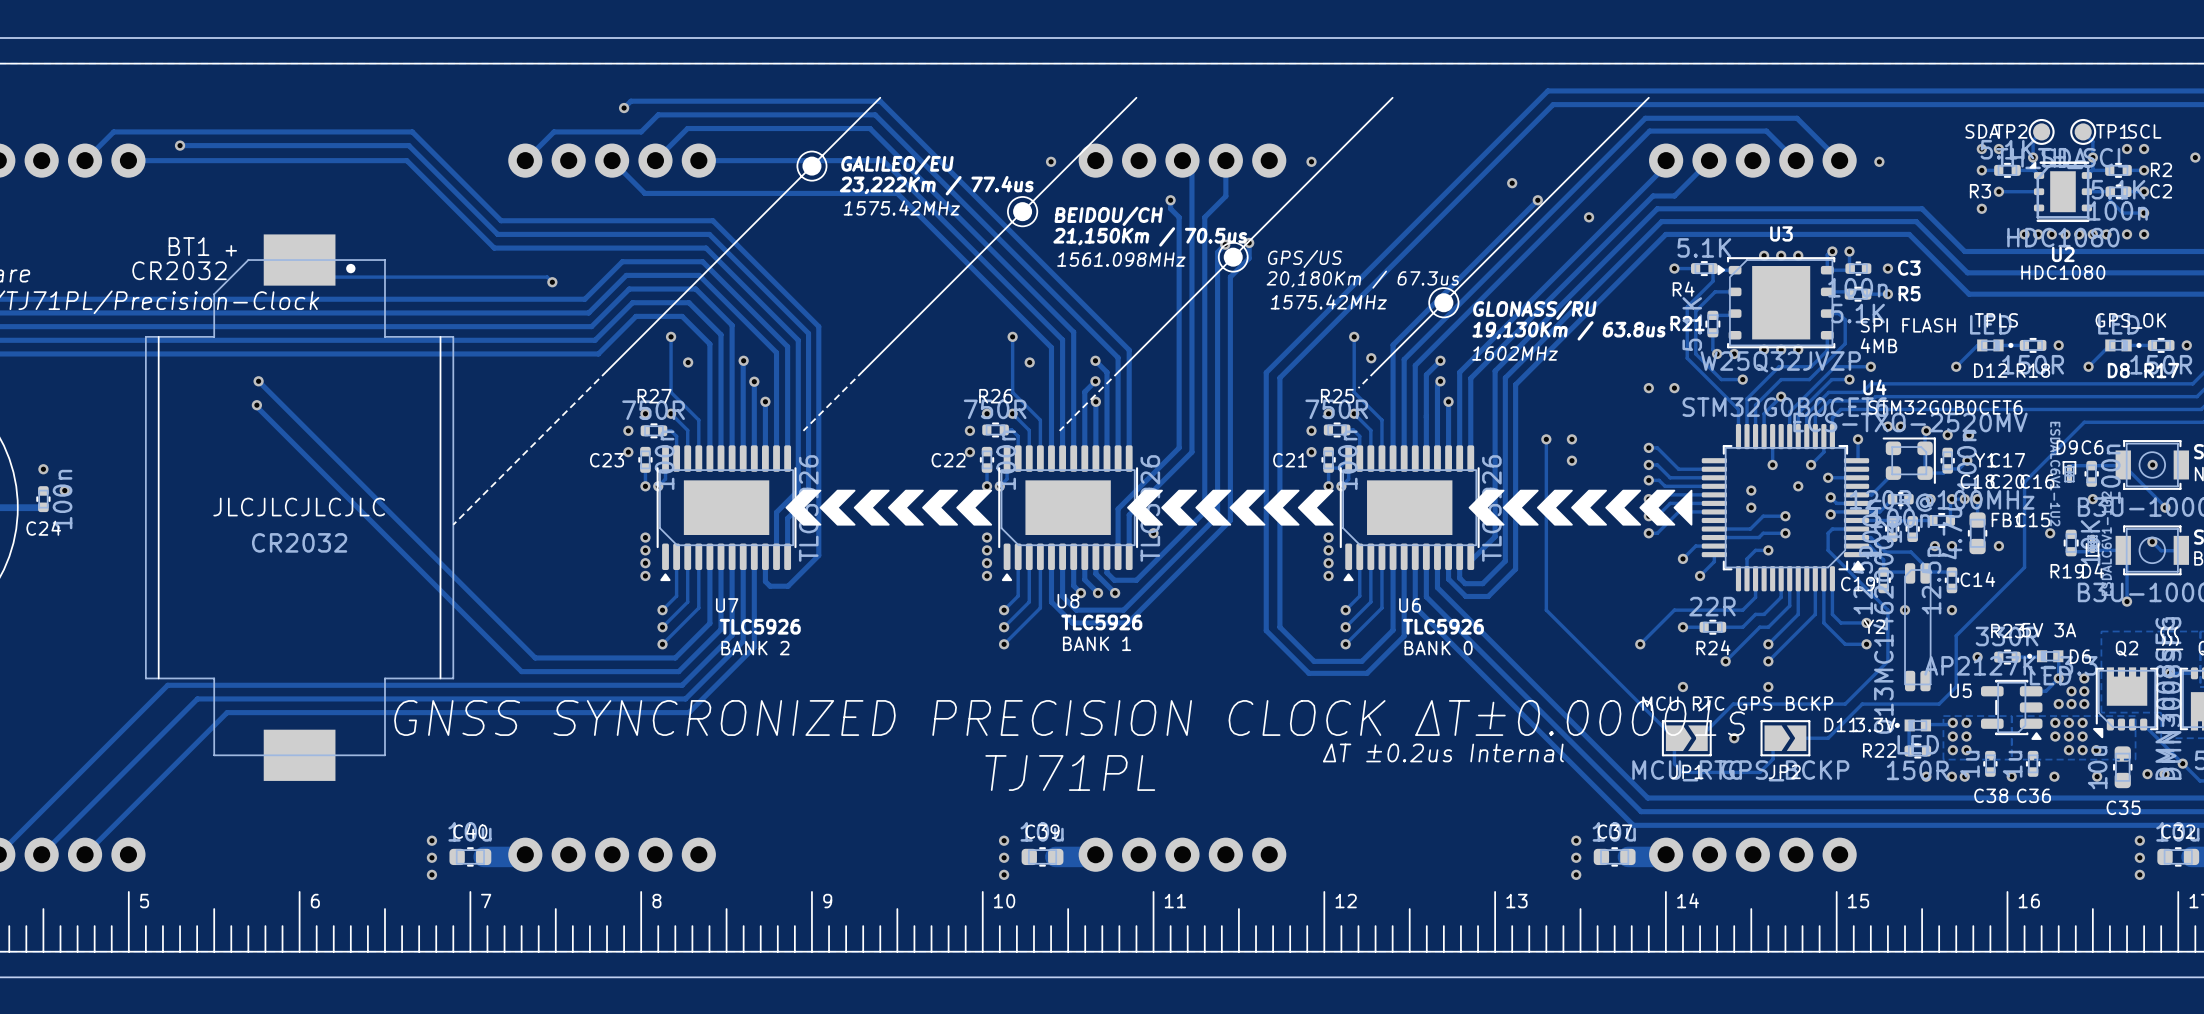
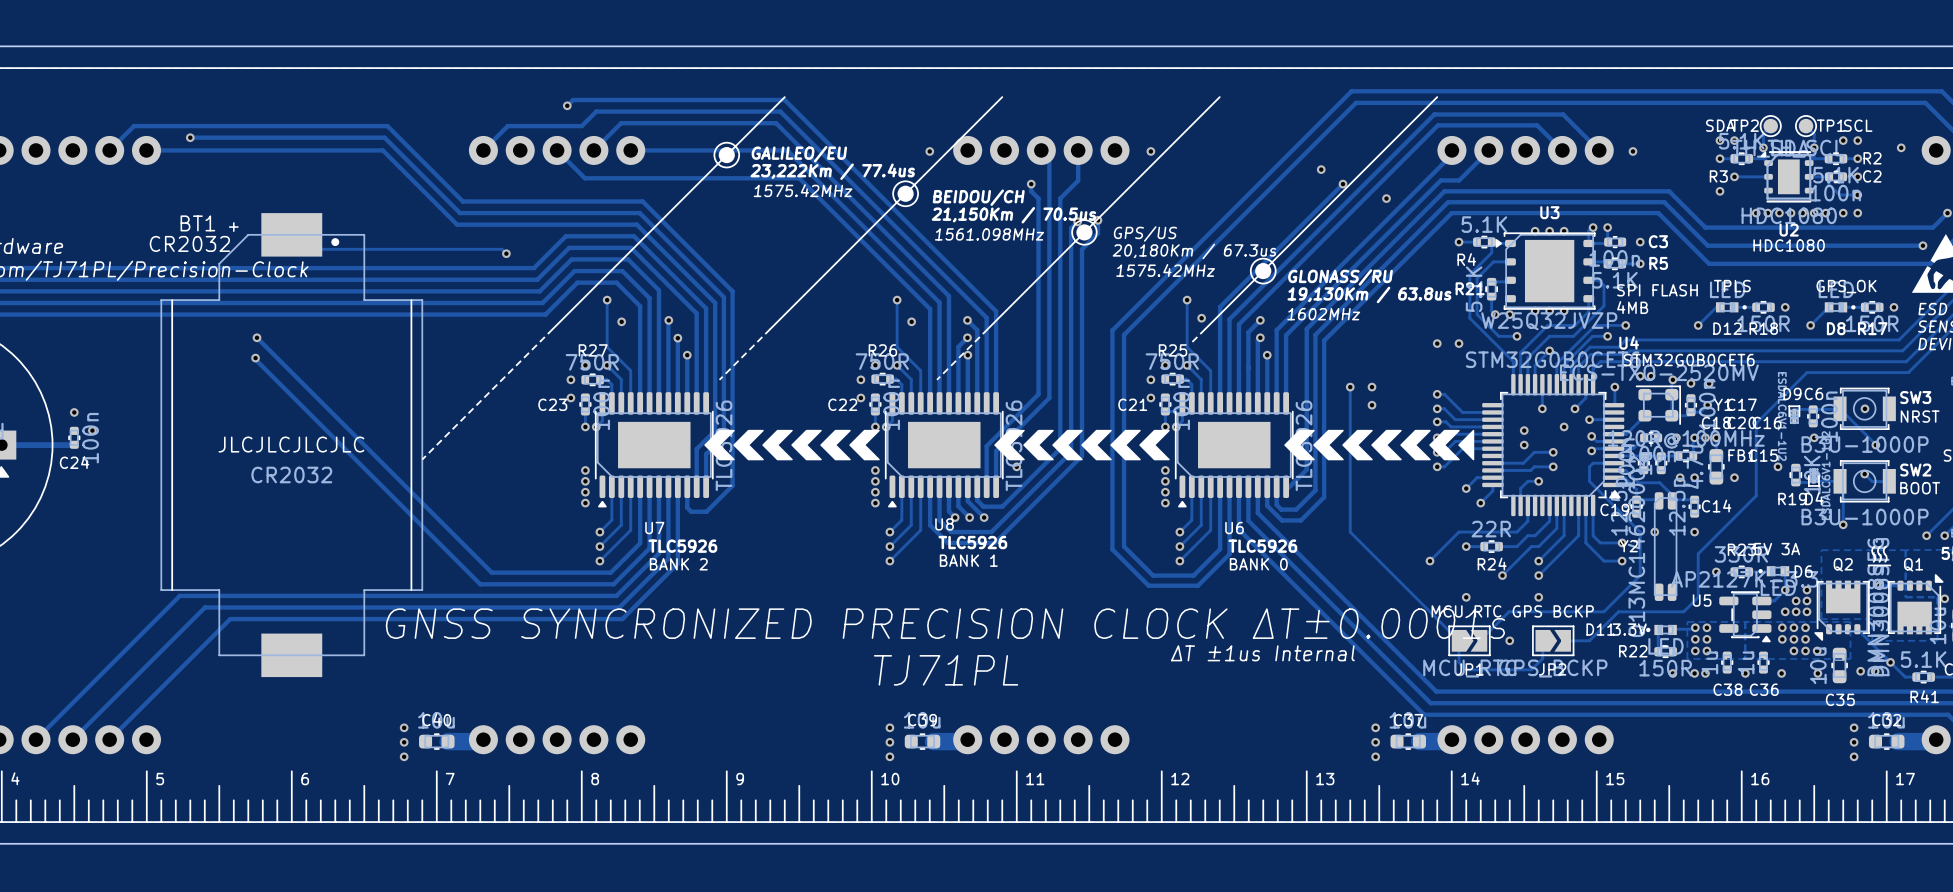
text: GNSS SYNCRONIZED PRECISION CLOCK ΔT±0.00001s (1069, 718) -> GNSS SYNCRONIZED PRECISION CLOCK ΔT±0.0001s (945, 623)
text: ΔT ±0.2us Internal (1443, 752) -> ΔT ±1us Internal (1262, 653)

